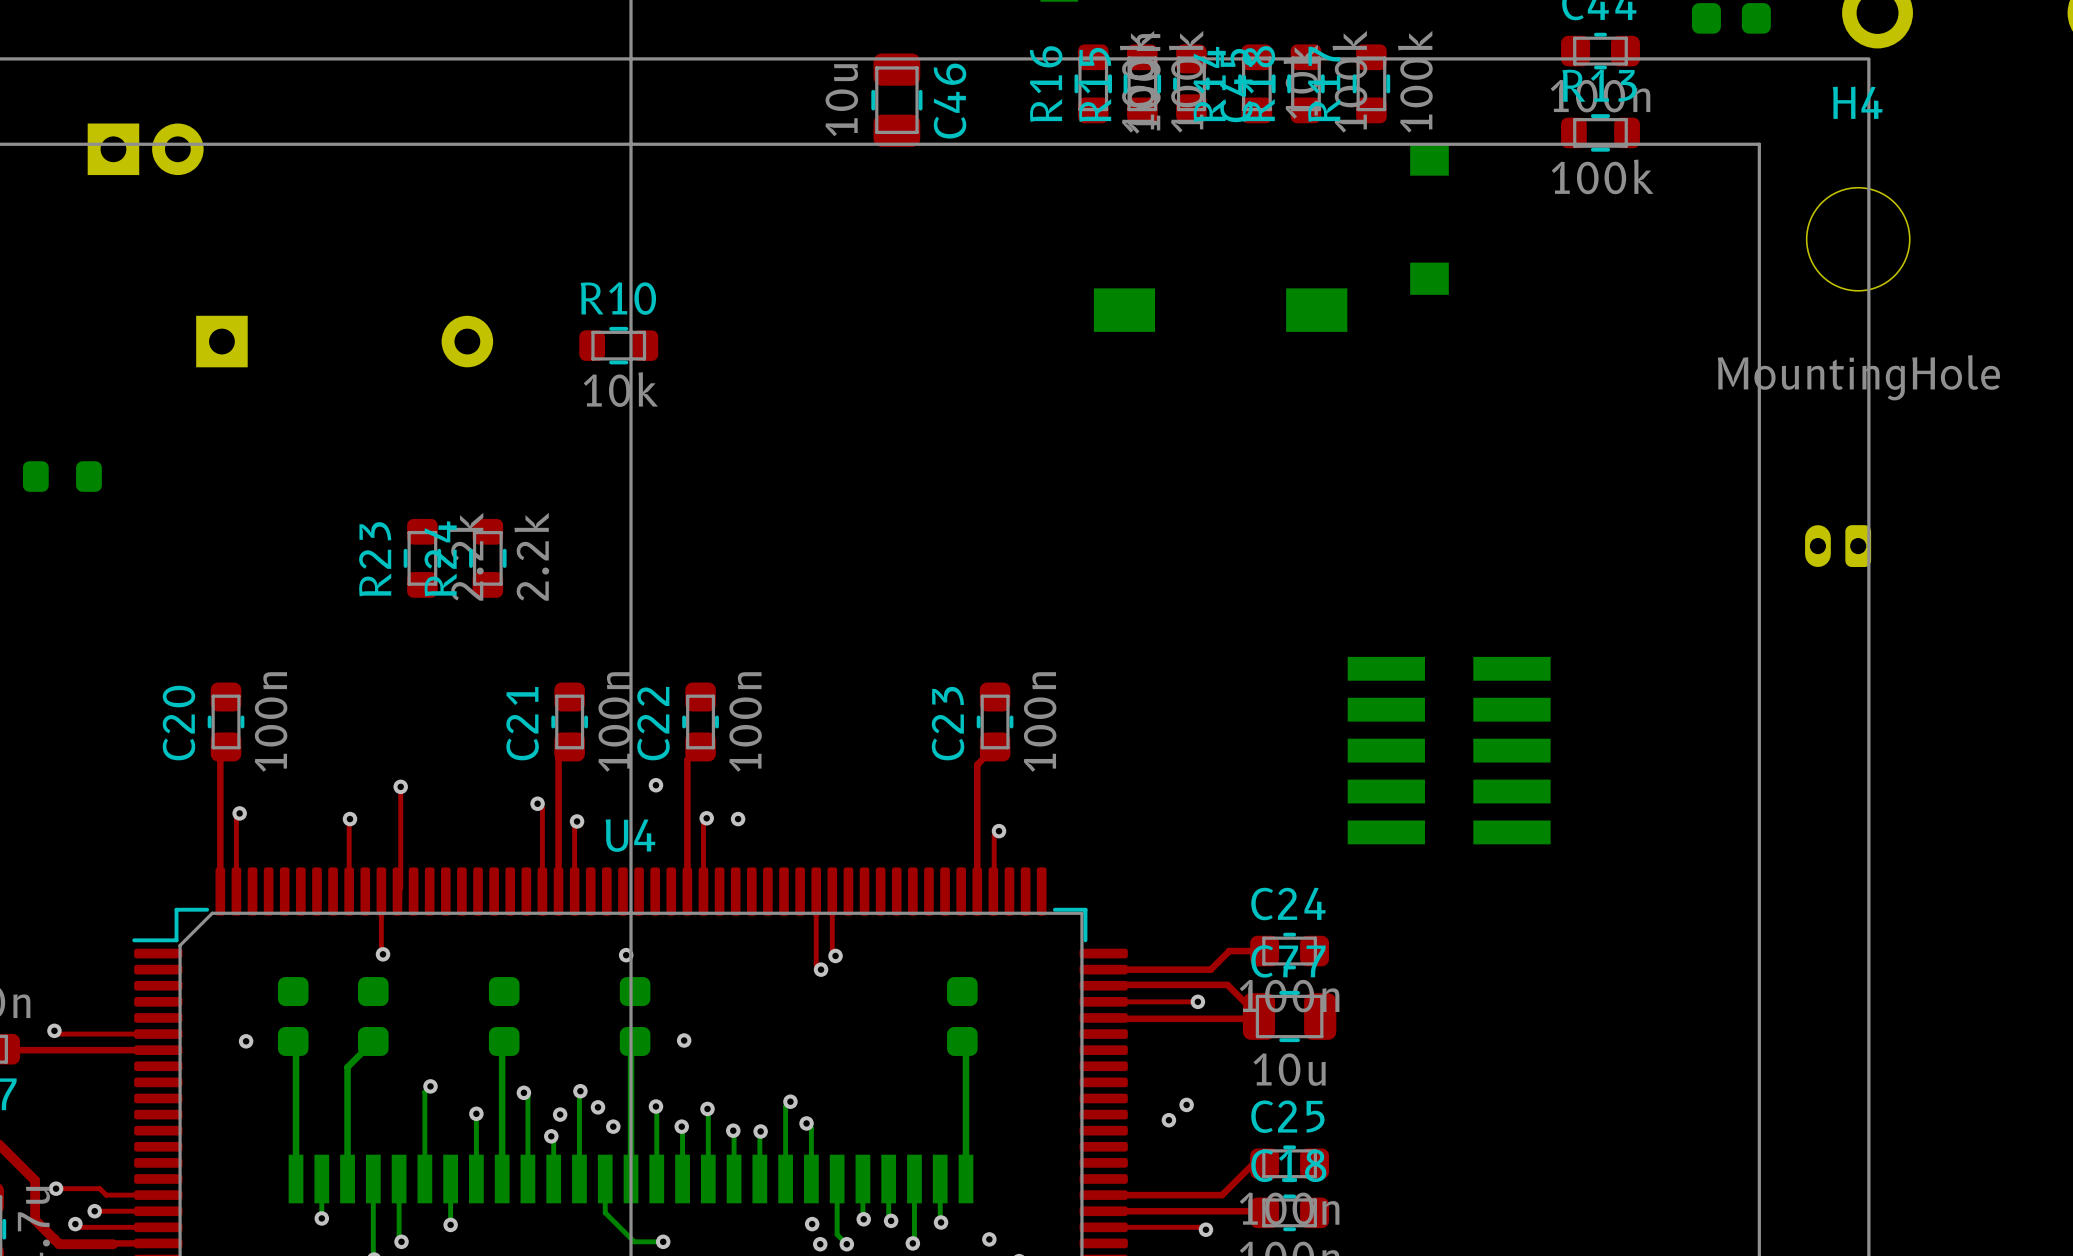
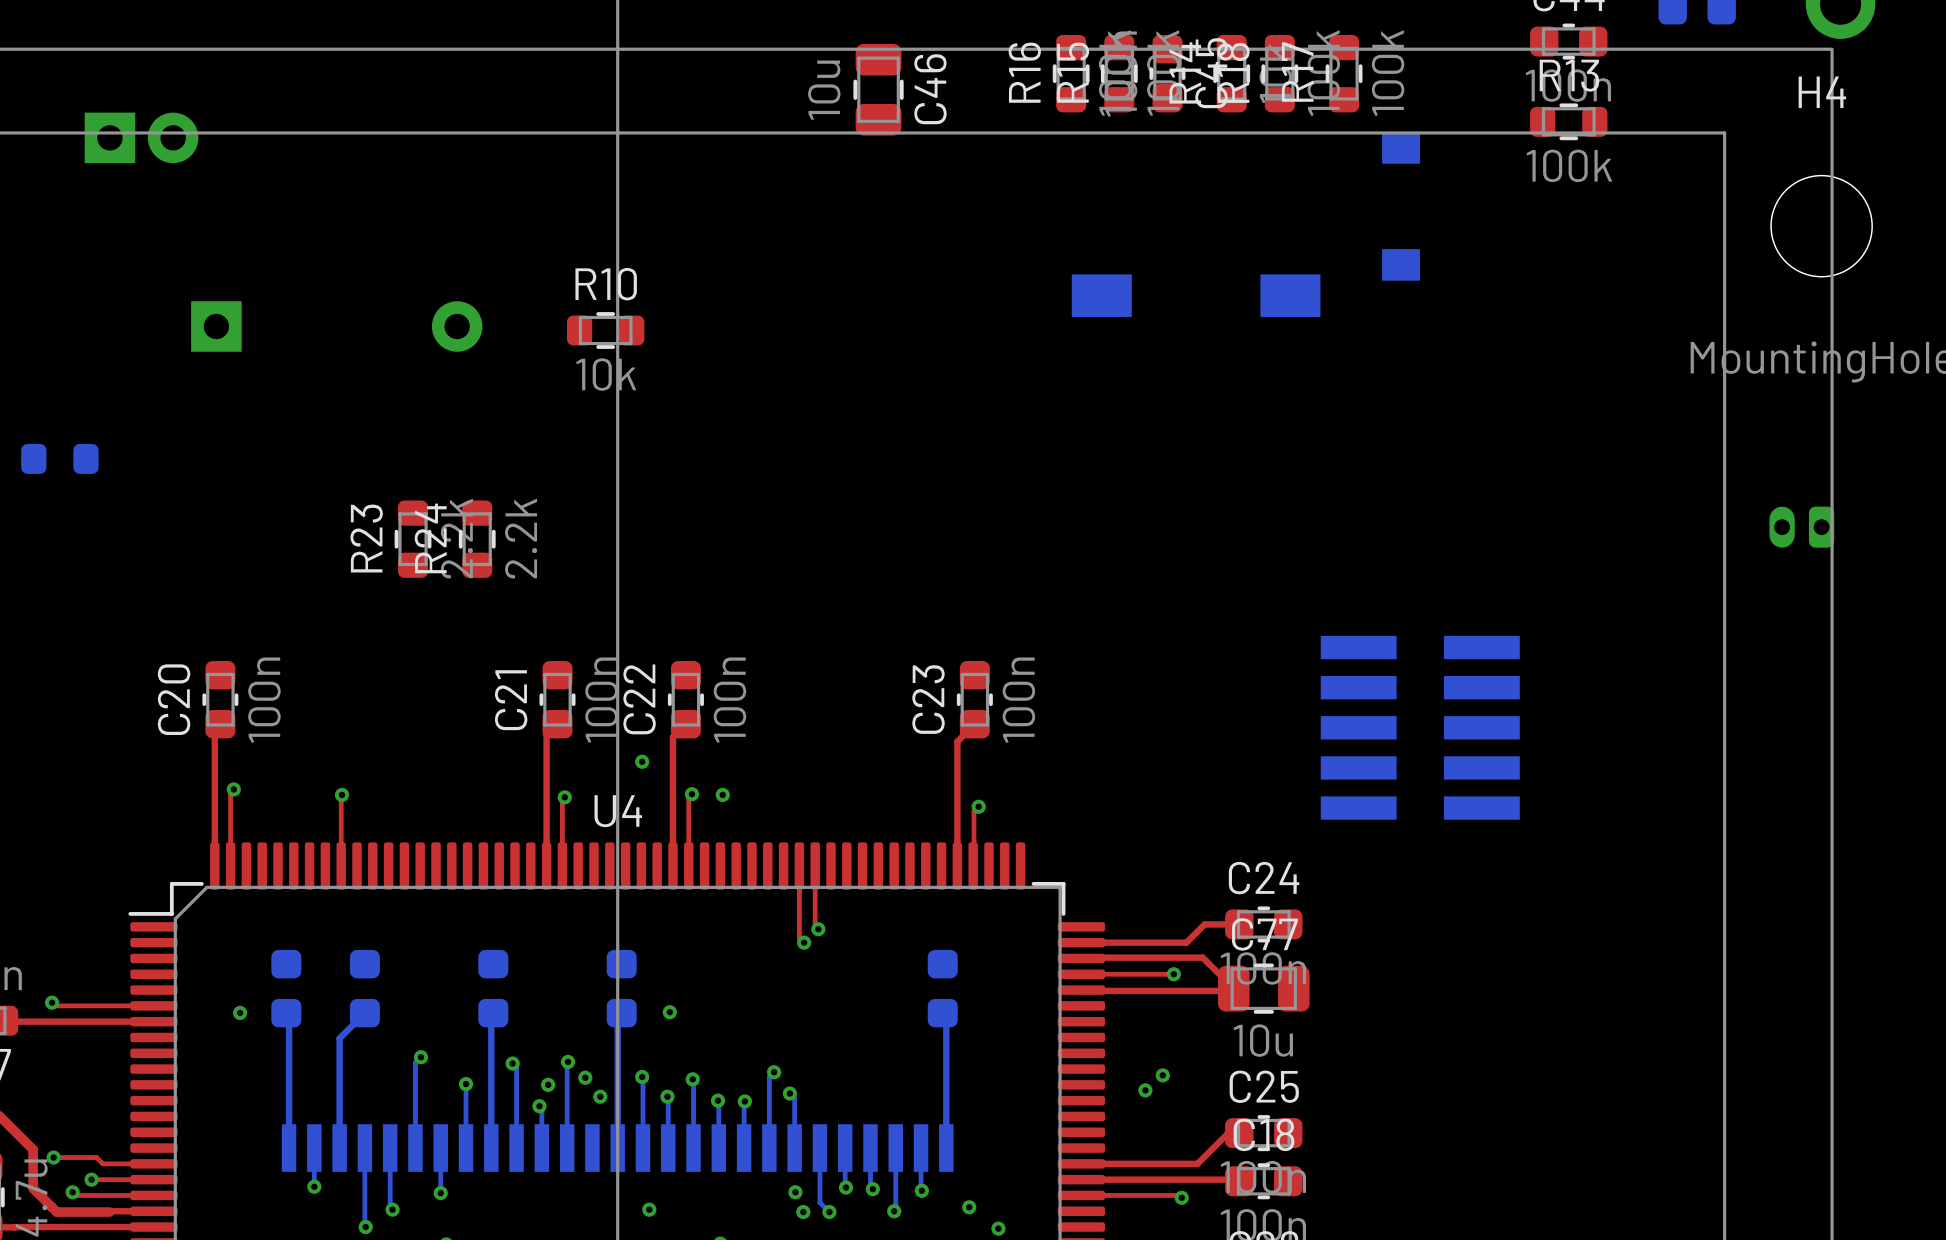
top track: (400, 786) (400, 888) (397, 891) -> none
via: (400, 786) -> none
top track: (537, 803) (542, 808) (542, 891) -> none
via: (537, 803) -> none
top track: (381, 891) (381, 952) (382, 954) -> none
via: (382, 954) -> none
via: (626, 955) -> none
bottom track: (605, 1179) (605, 1212) (634, 1241) (663, 1241) -> none

